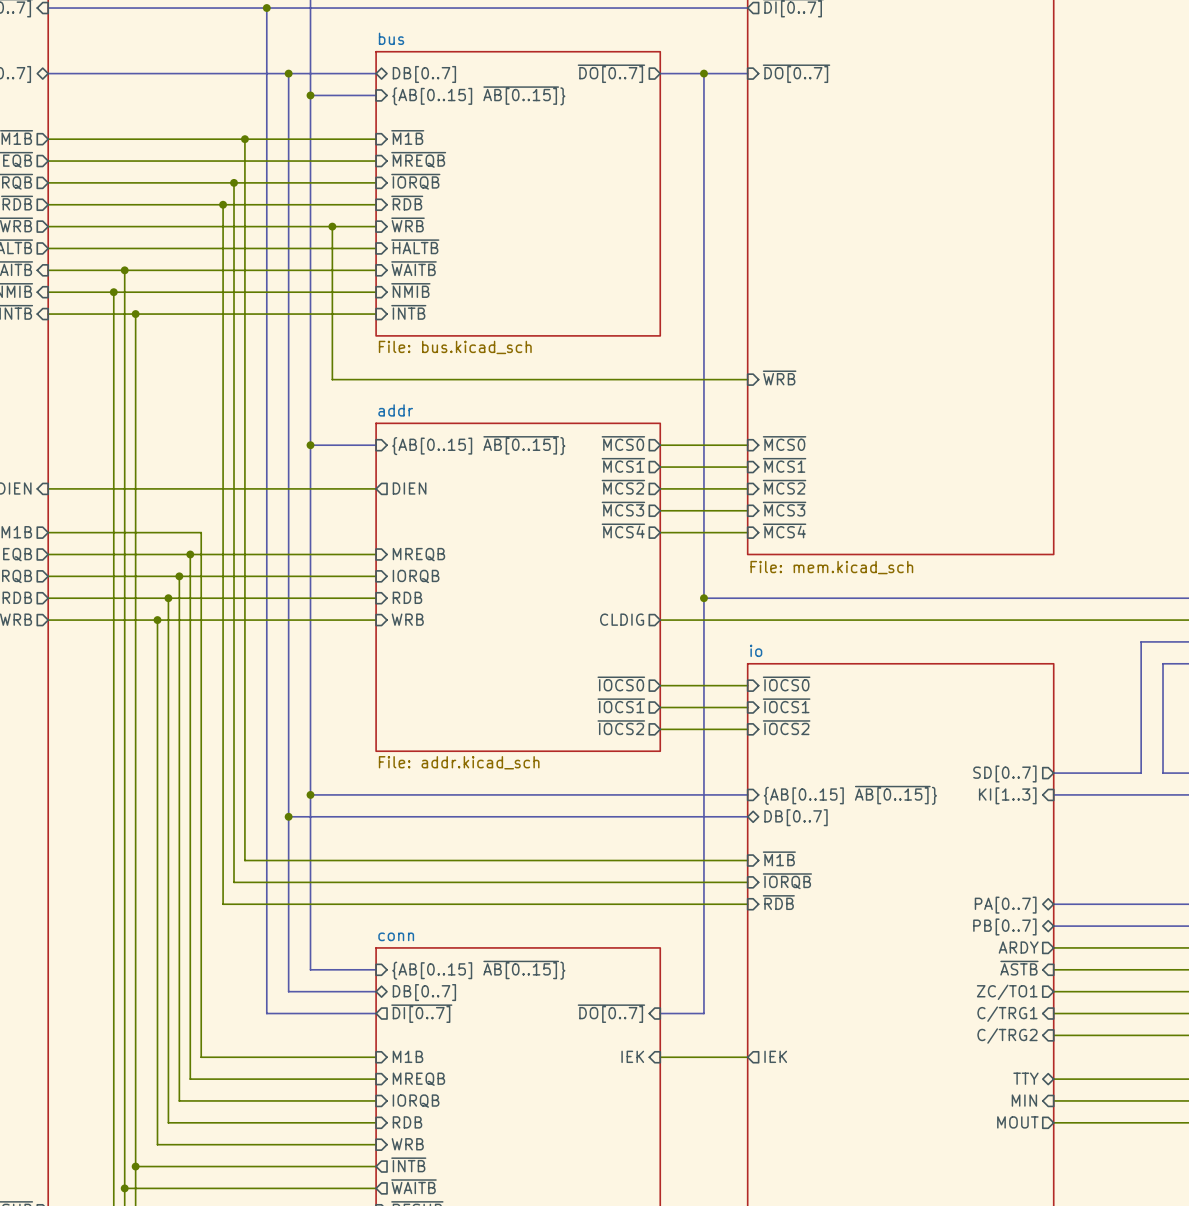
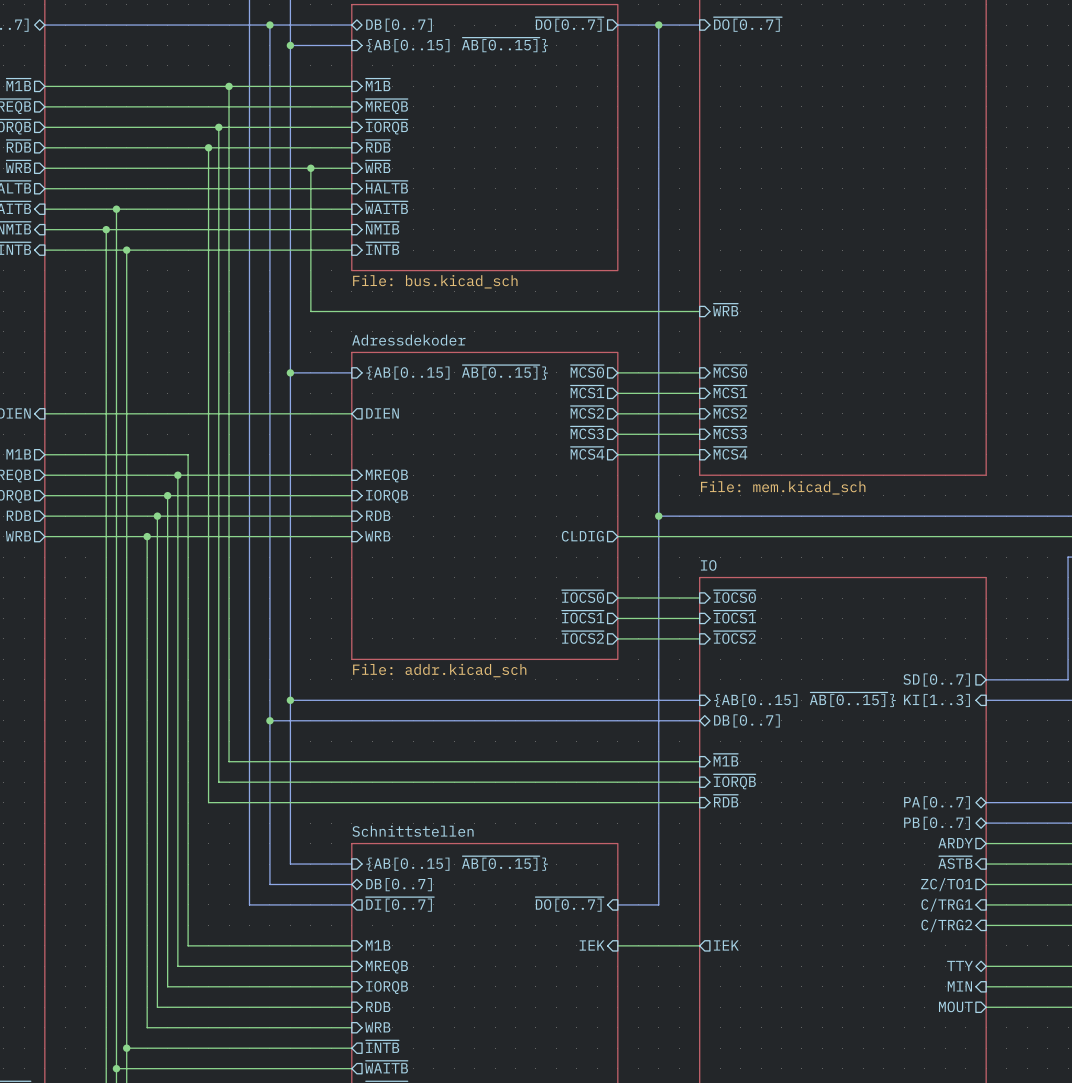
sheet addr name: addr (395, 410) -> Adressdekoder (408, 340)
sheet io name: io (756, 650) -> IO (708, 565)
sheet conn name: conn (396, 936) -> Schnittstellen (413, 831)

